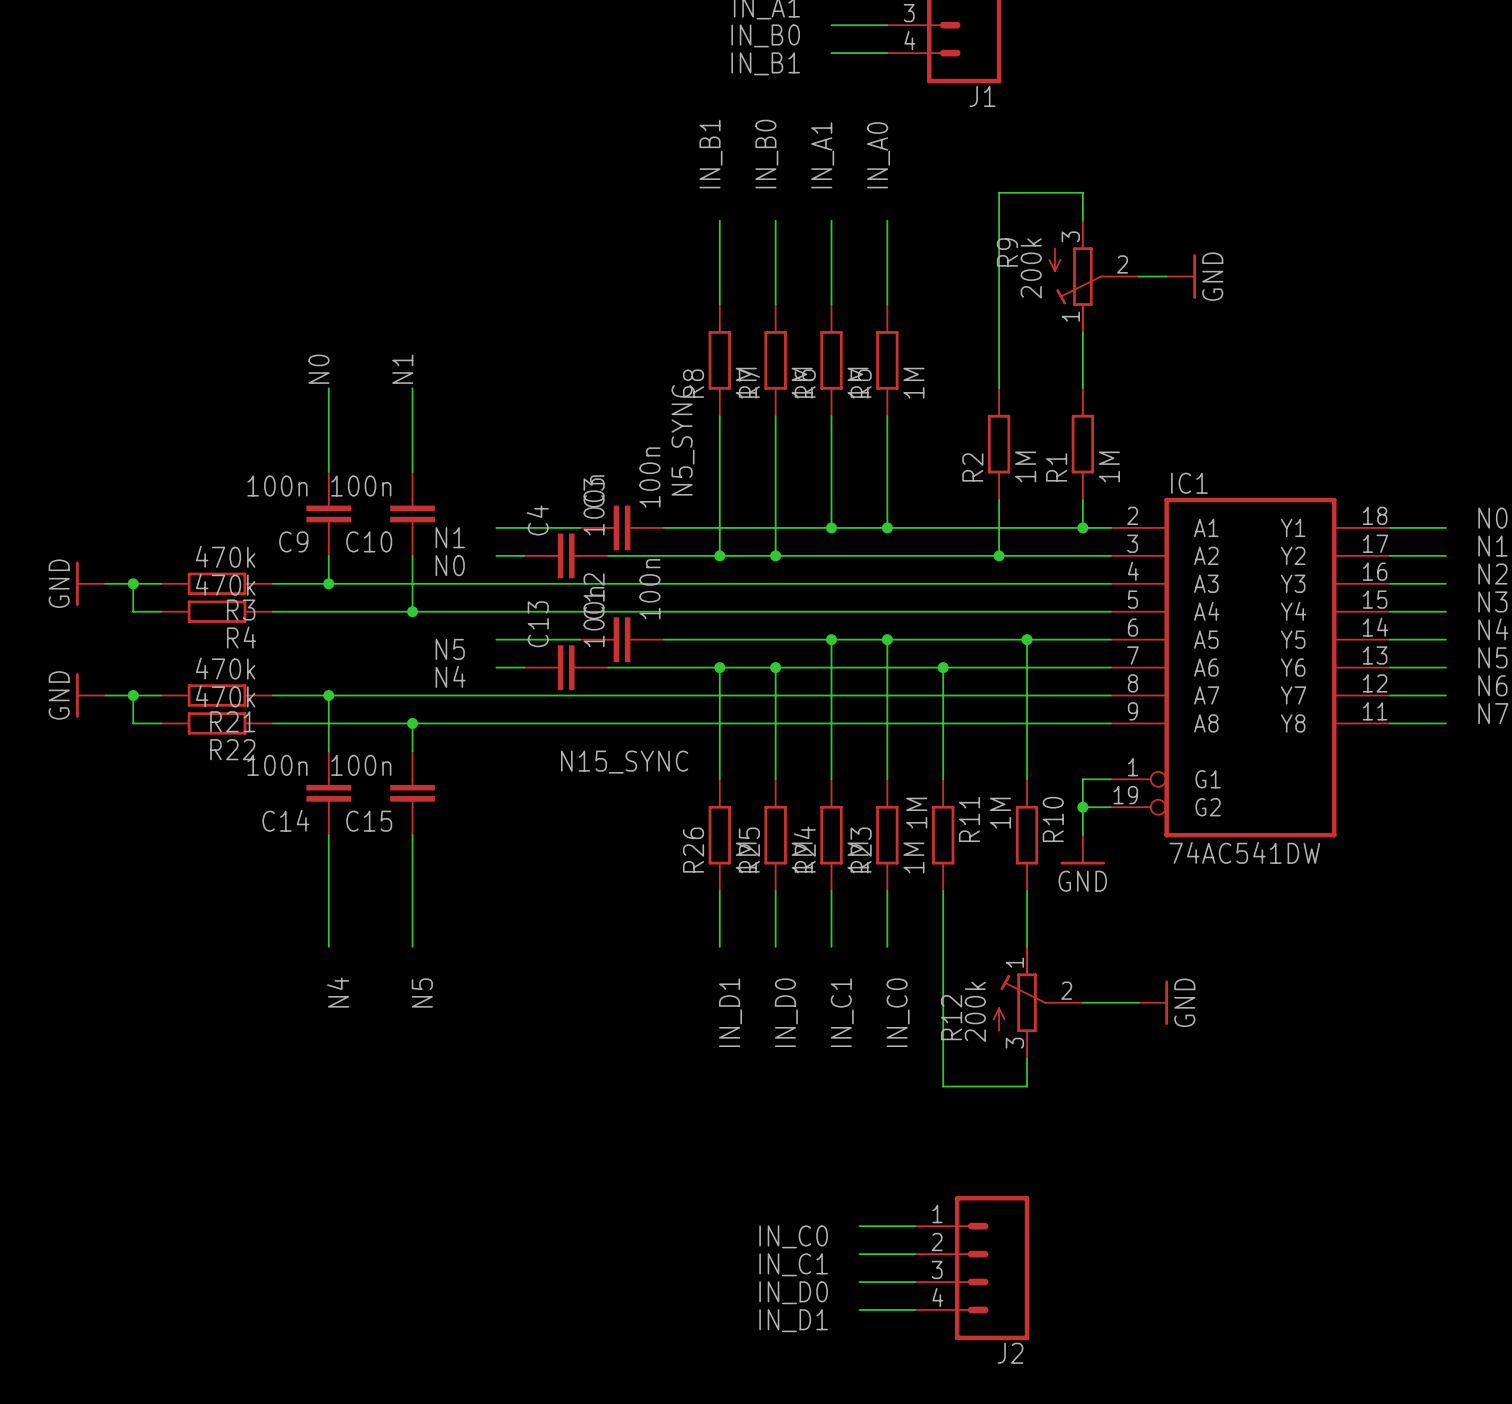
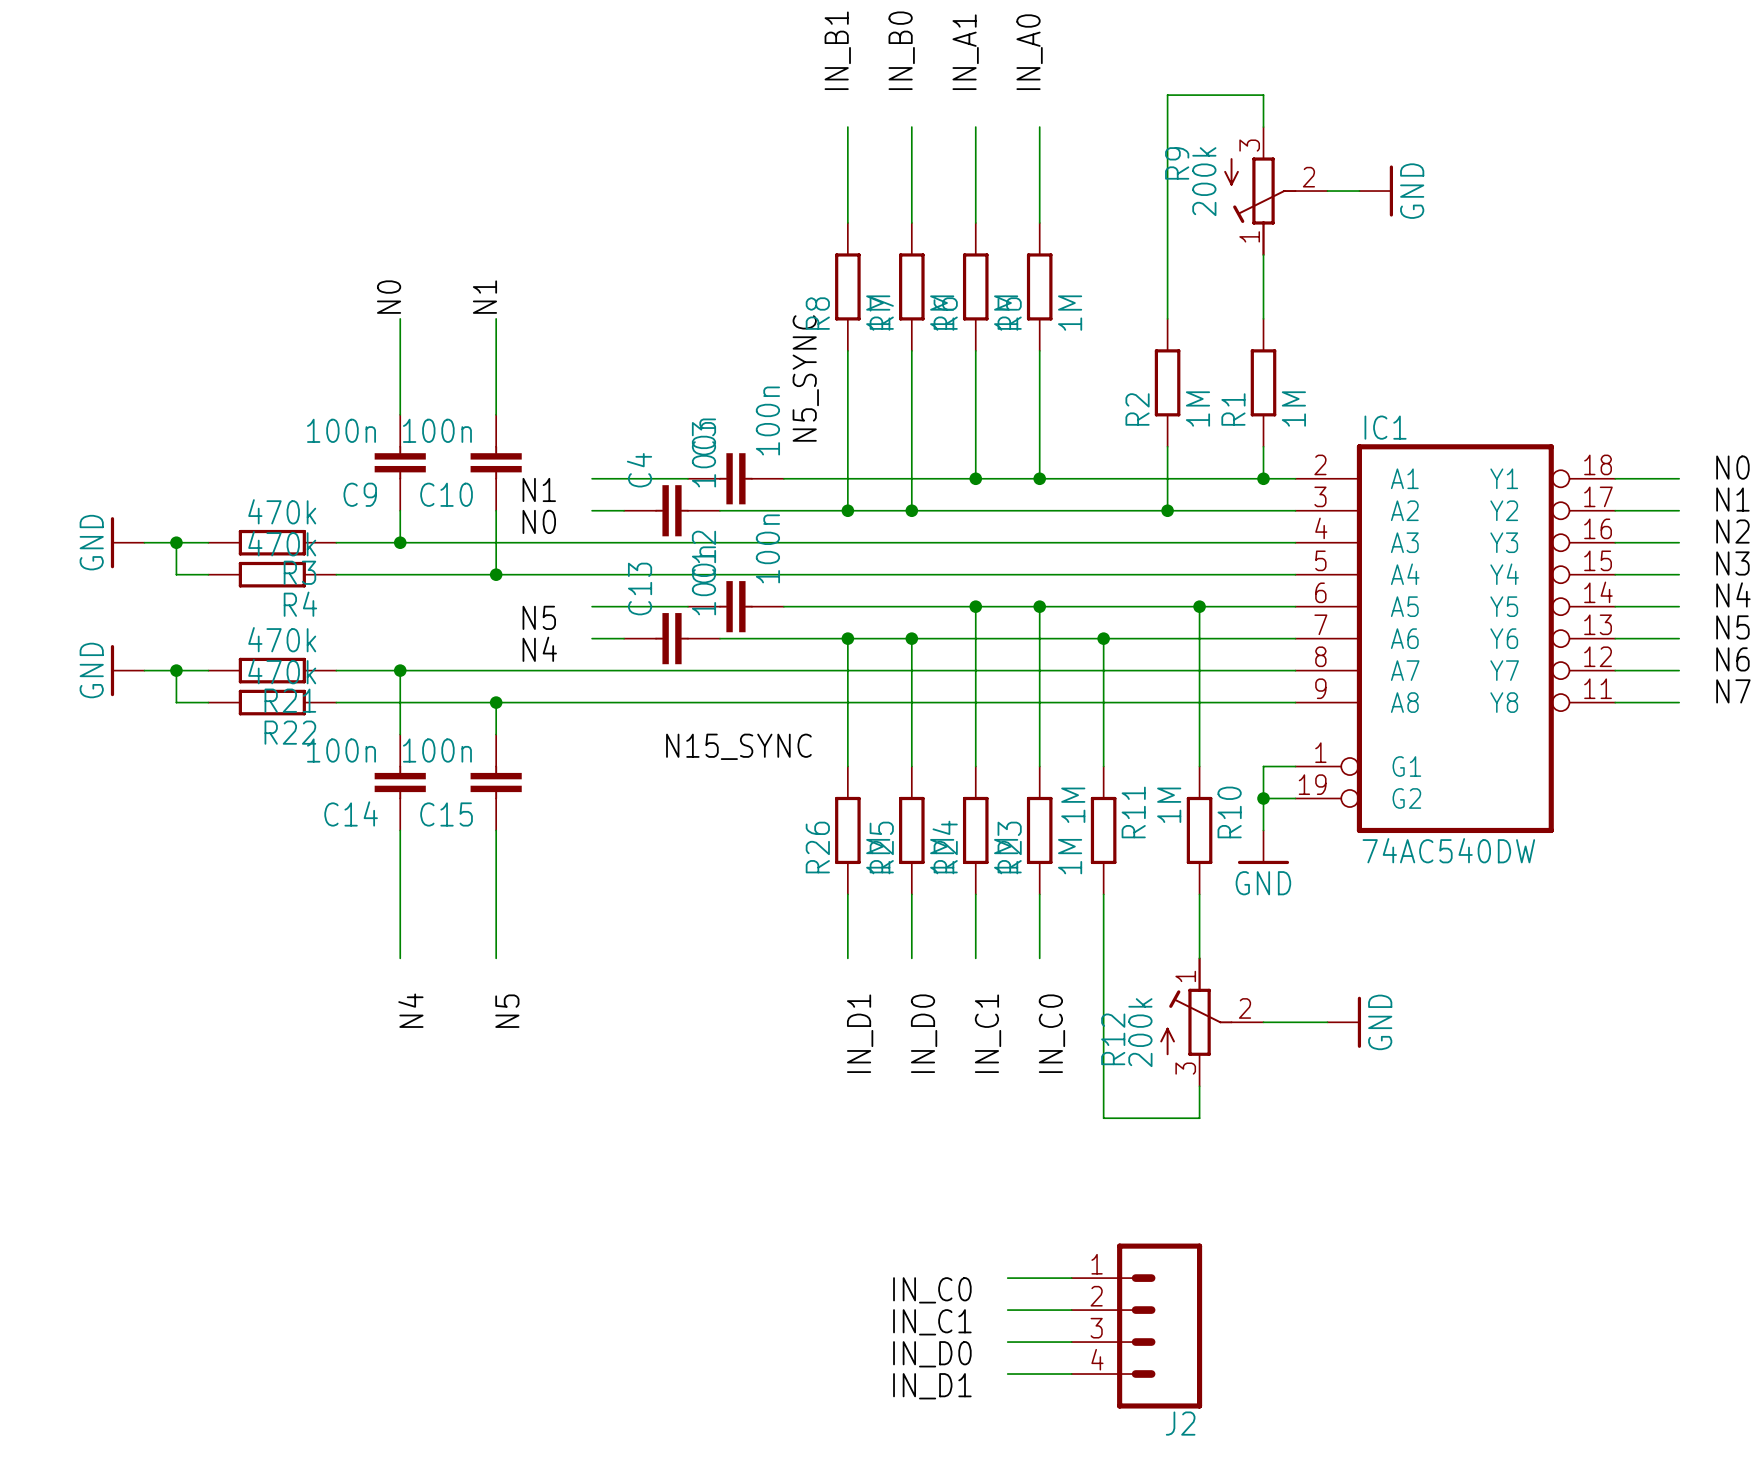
IC1 symbol: [1110, 497, 1391, 838] -> [1295, 444, 1616, 834]
IC1 value: 74AC541DW (1244, 852) -> 74AC540DW (1448, 850)

